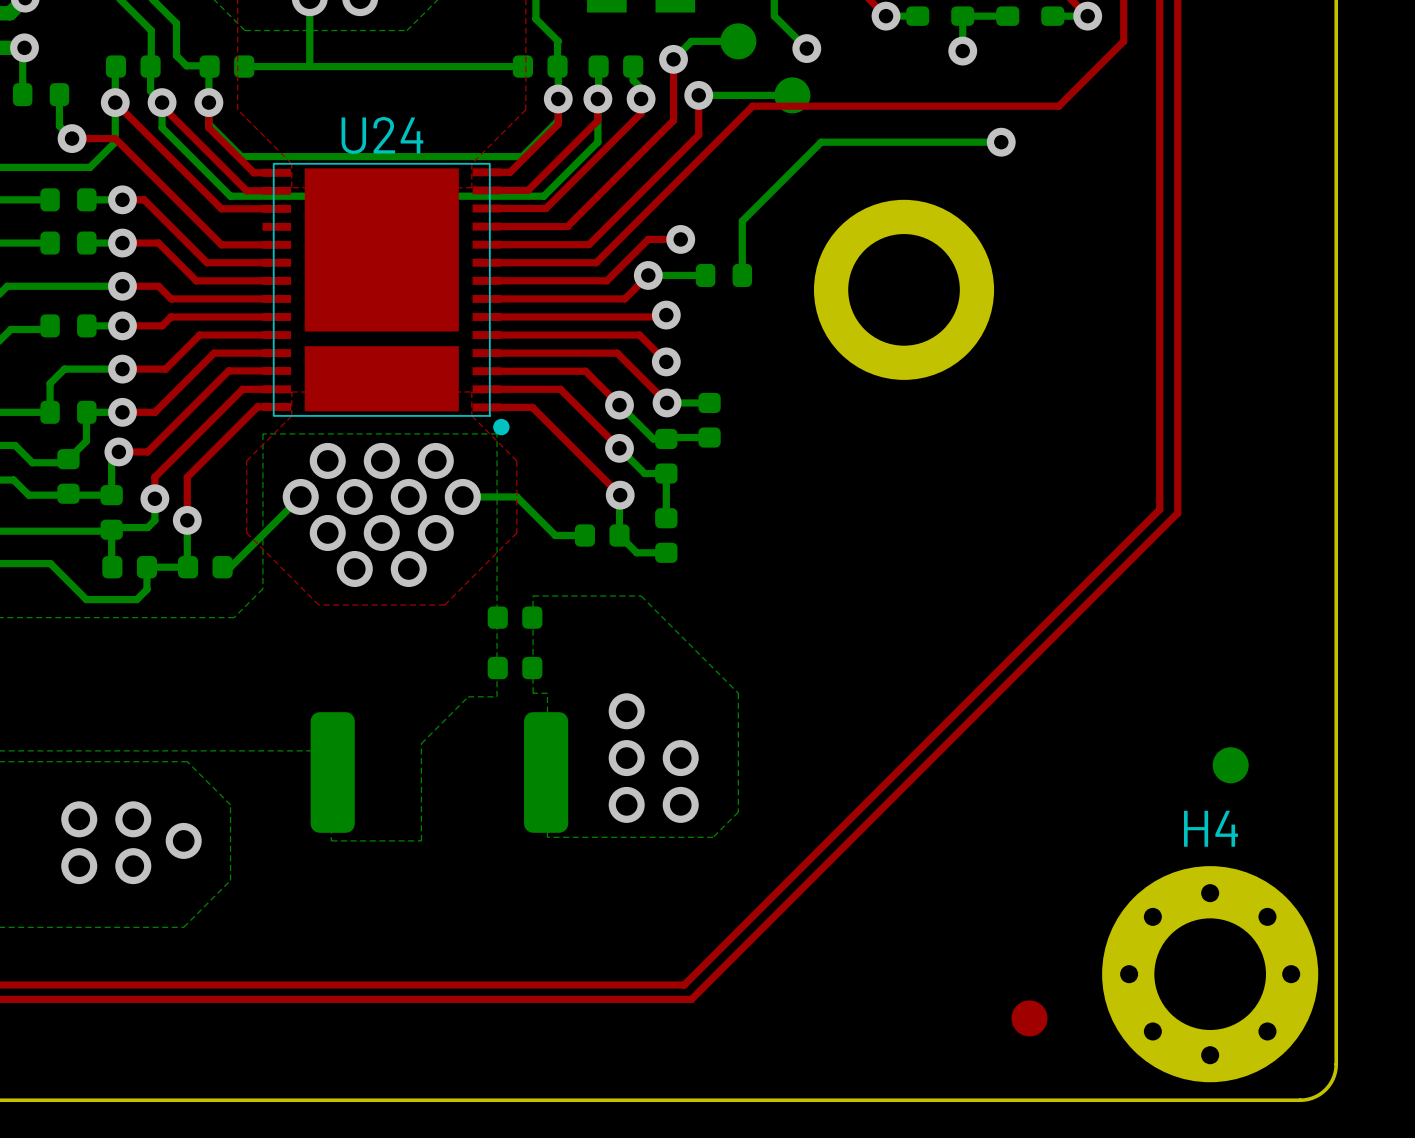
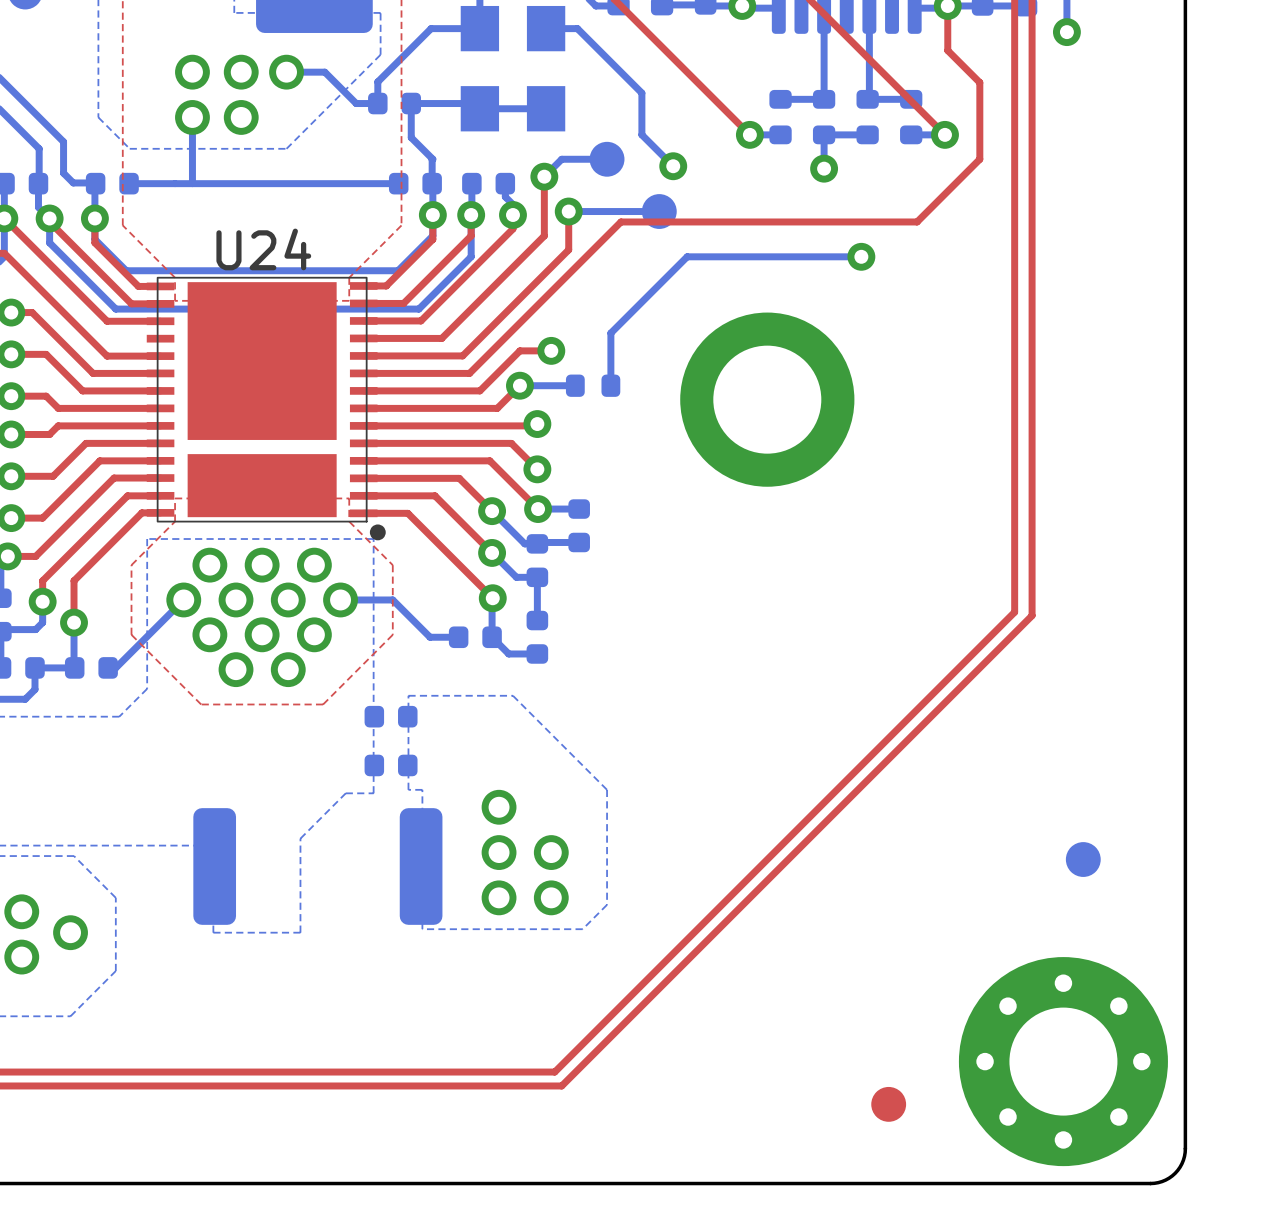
H4 name: H4 (1211, 828) -> none

